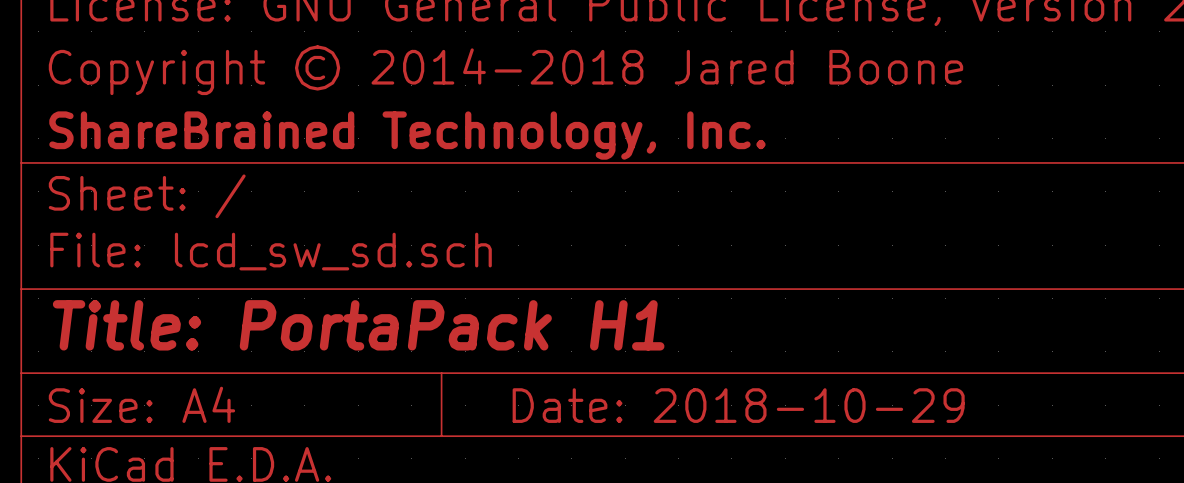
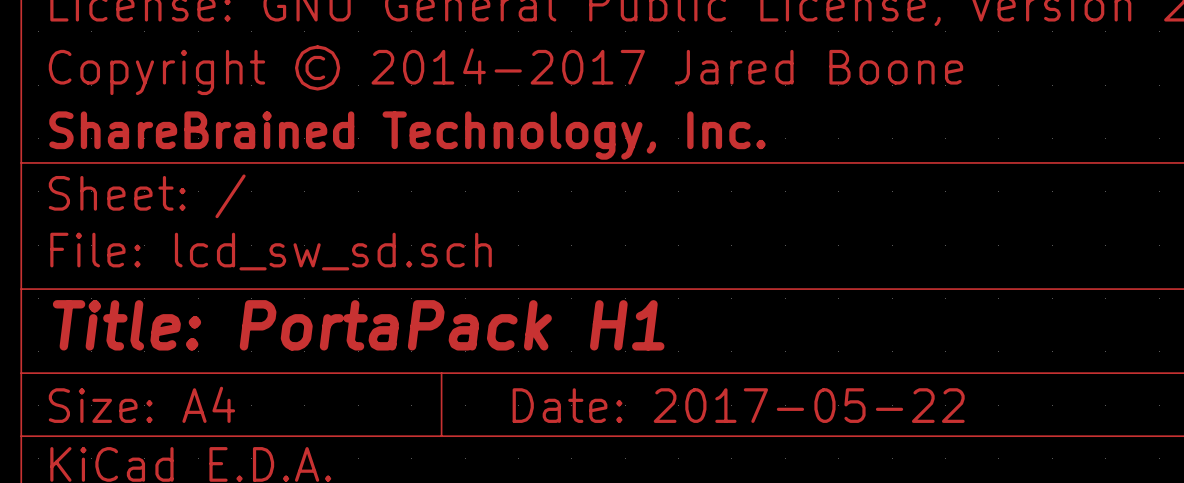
title block: Copyright © 2014-2018 Jared Boone (505, 70) -> Copyright © 2014-2017 Jared Boone (505, 70)
title block: Date: 2018-10-29 (738, 405) -> Date: 2017-05-22 (738, 405)

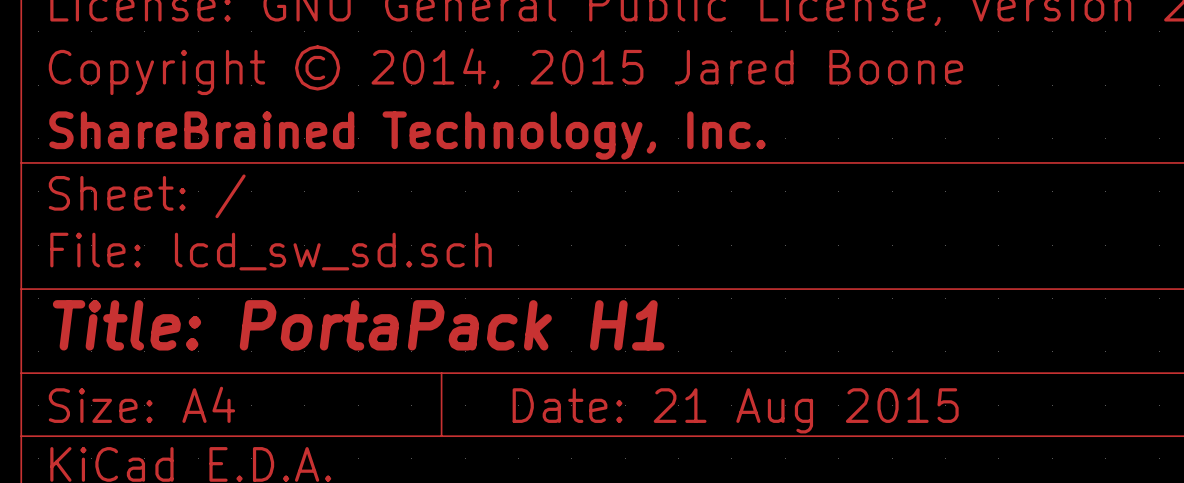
title block: Copyright © 2014-2017 Jared Boone (505, 70) -> Copyright © 2014, 2015 Jared Boone (505, 70)
title block: Date: 2017-05-22 (738, 405) -> Date: 21 Aug 2015 (735, 410)

